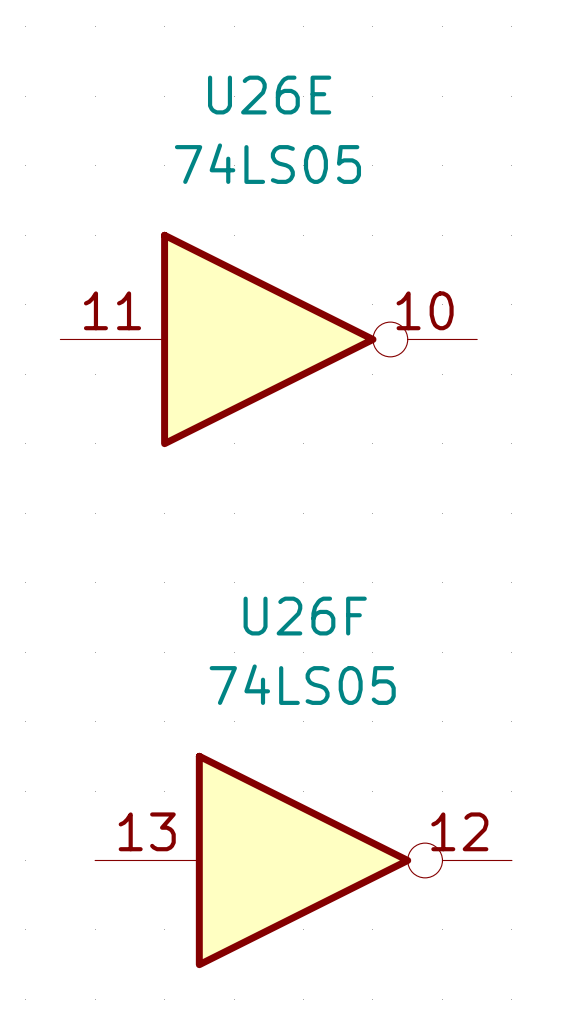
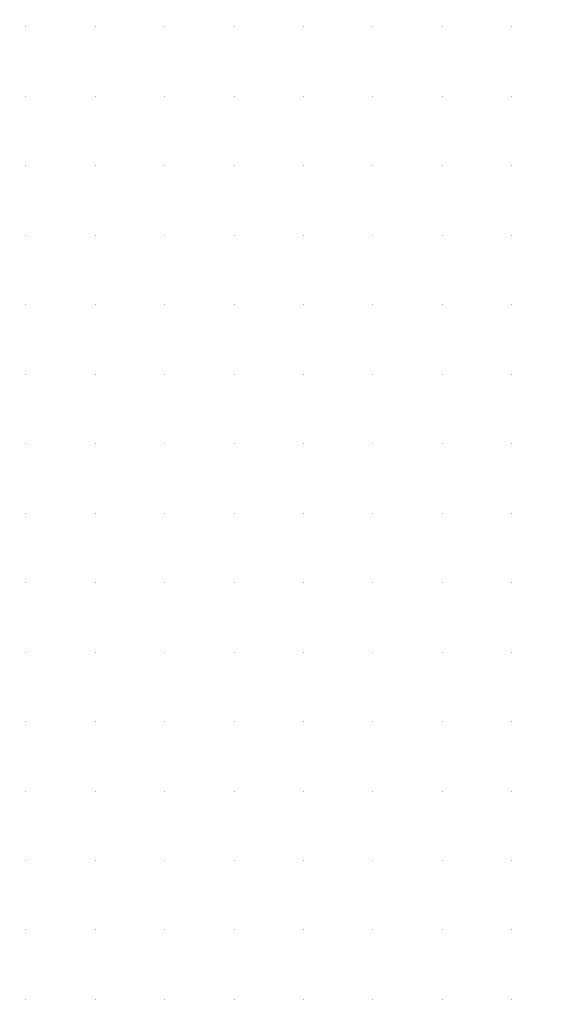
U26E: 74LS05 (268, 339) -> none
U26F: 74LS05 (303, 860) -> none

